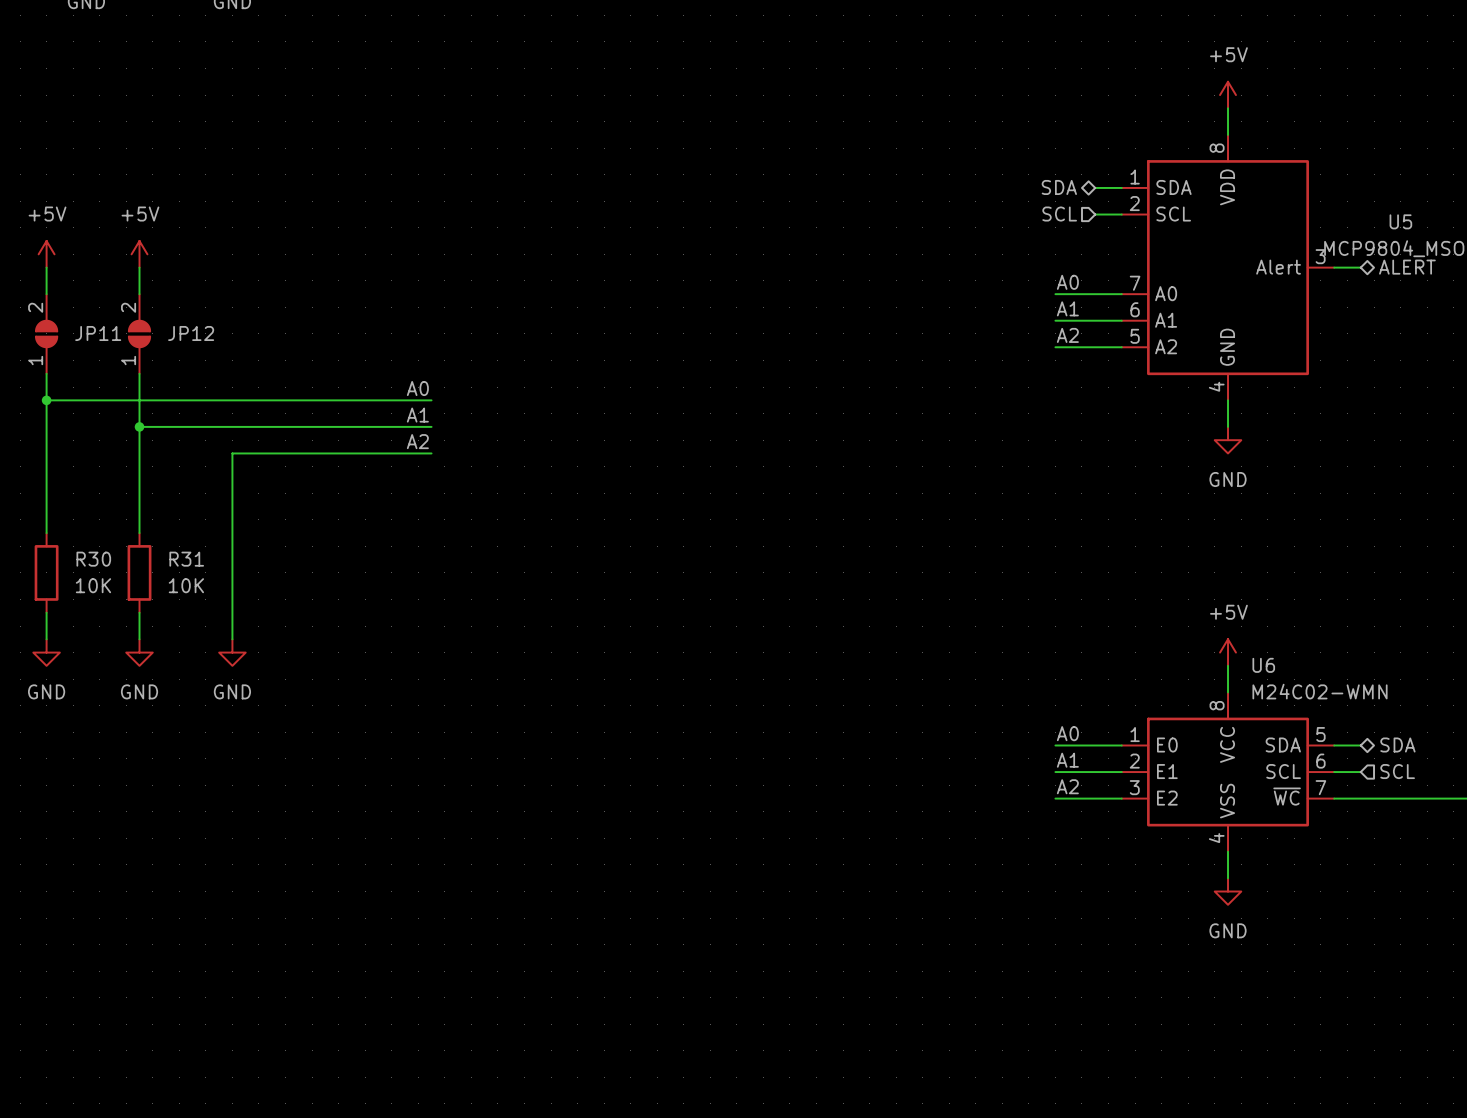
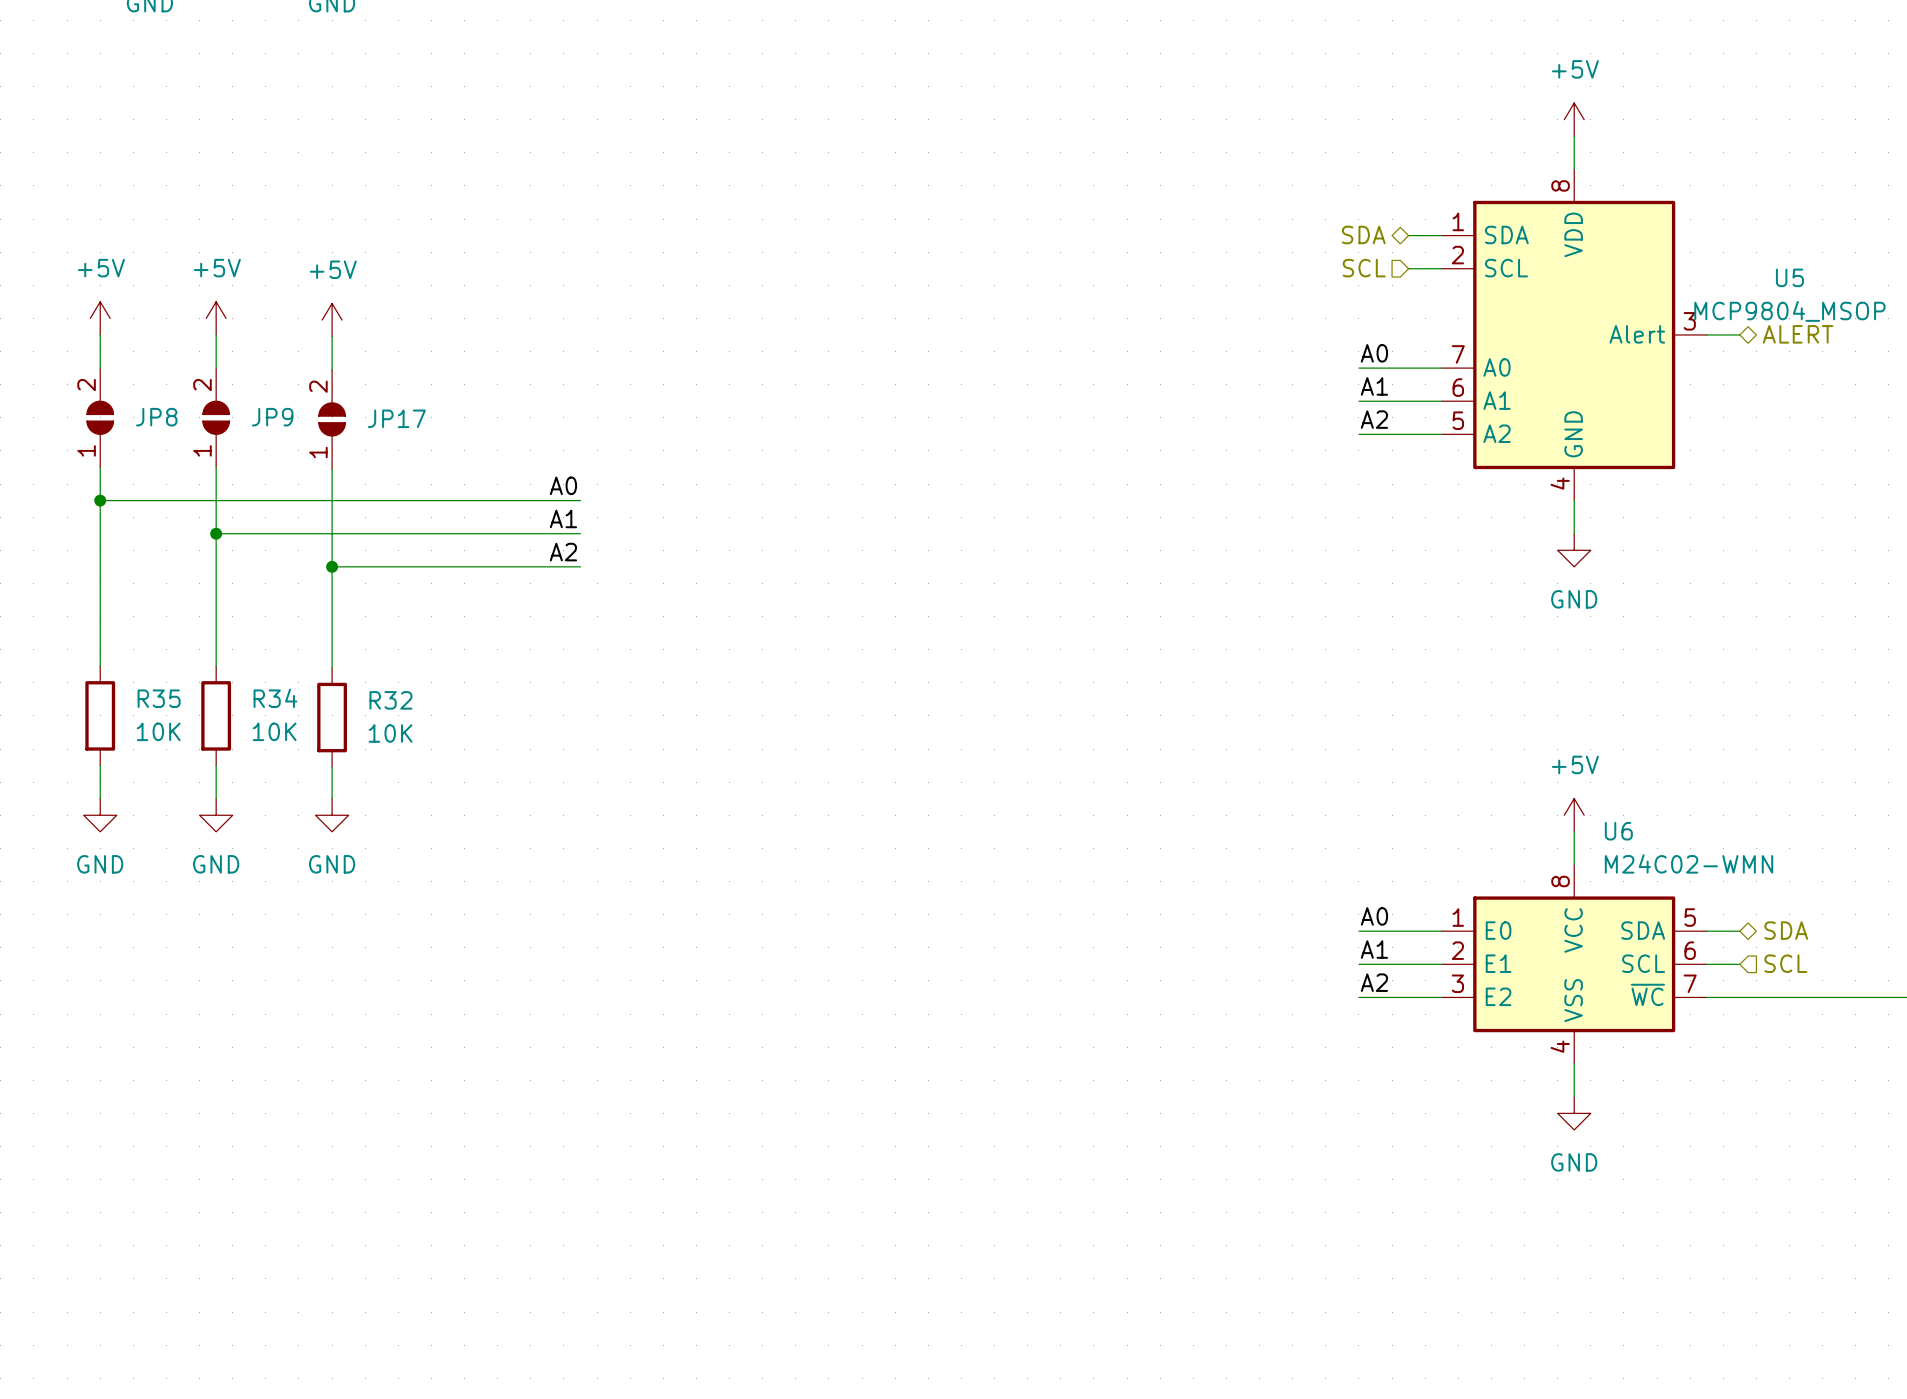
power symbol: none -> +5V (332, 320)
wire: none -> (332, 336) (332, 369)
JP11 name: JP11 (98, 333) -> JP8 (156, 417)
JP12 name: JP12 (191, 333) -> JP9 (272, 417)
JP17: none -> (332, 419)
wire: none -> (332, 469) (332, 566)
junction: none -> (332, 566)
wire: (232, 534) (232, 614) -> none
R30 name: R30 (93, 559) -> R35 (159, 698)
R31 name: R31 (186, 559) -> R34 (275, 698)
R32: none -> 10K (332, 717)

